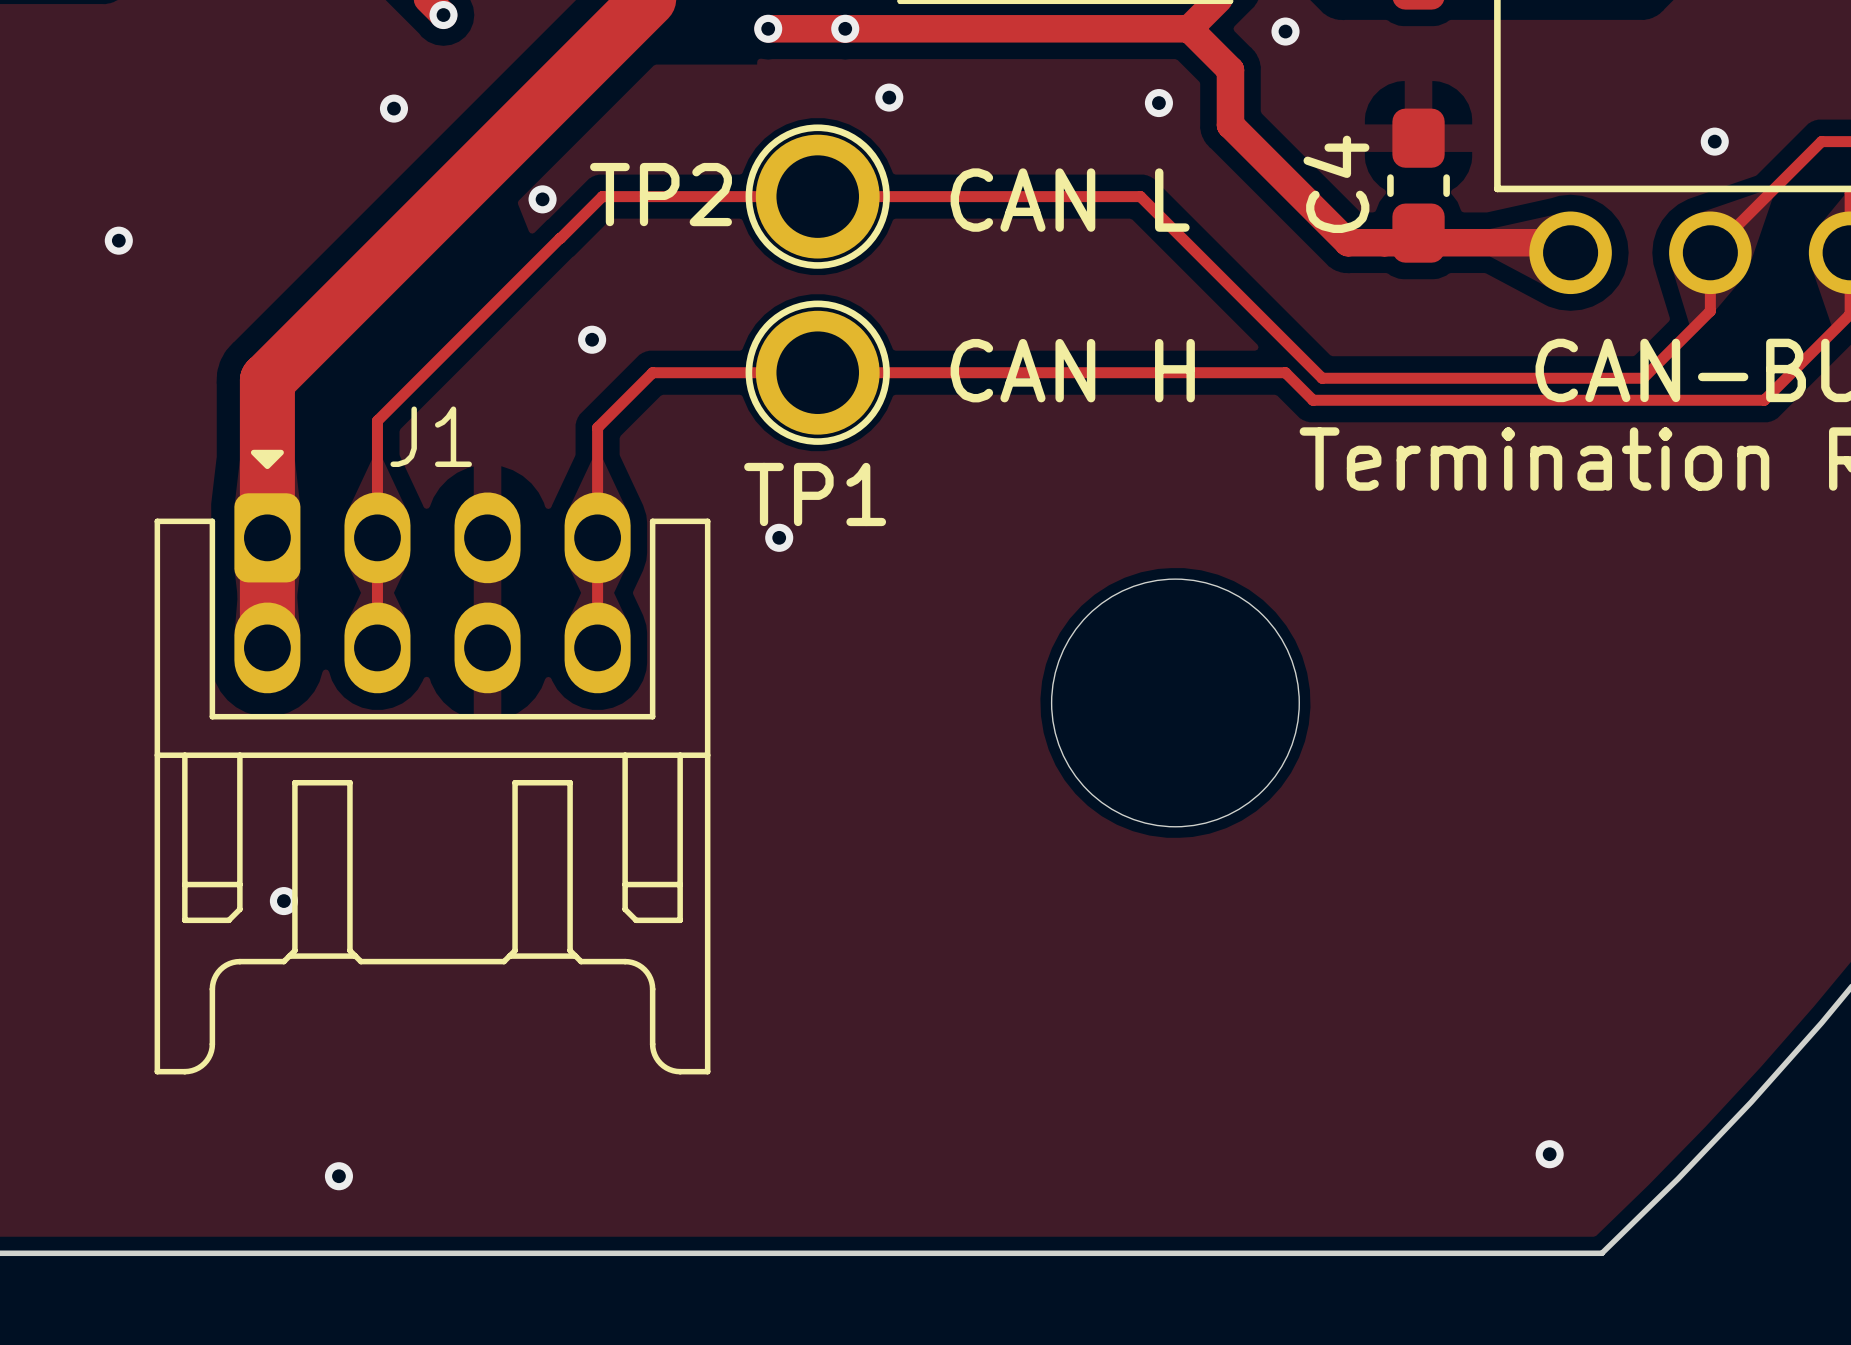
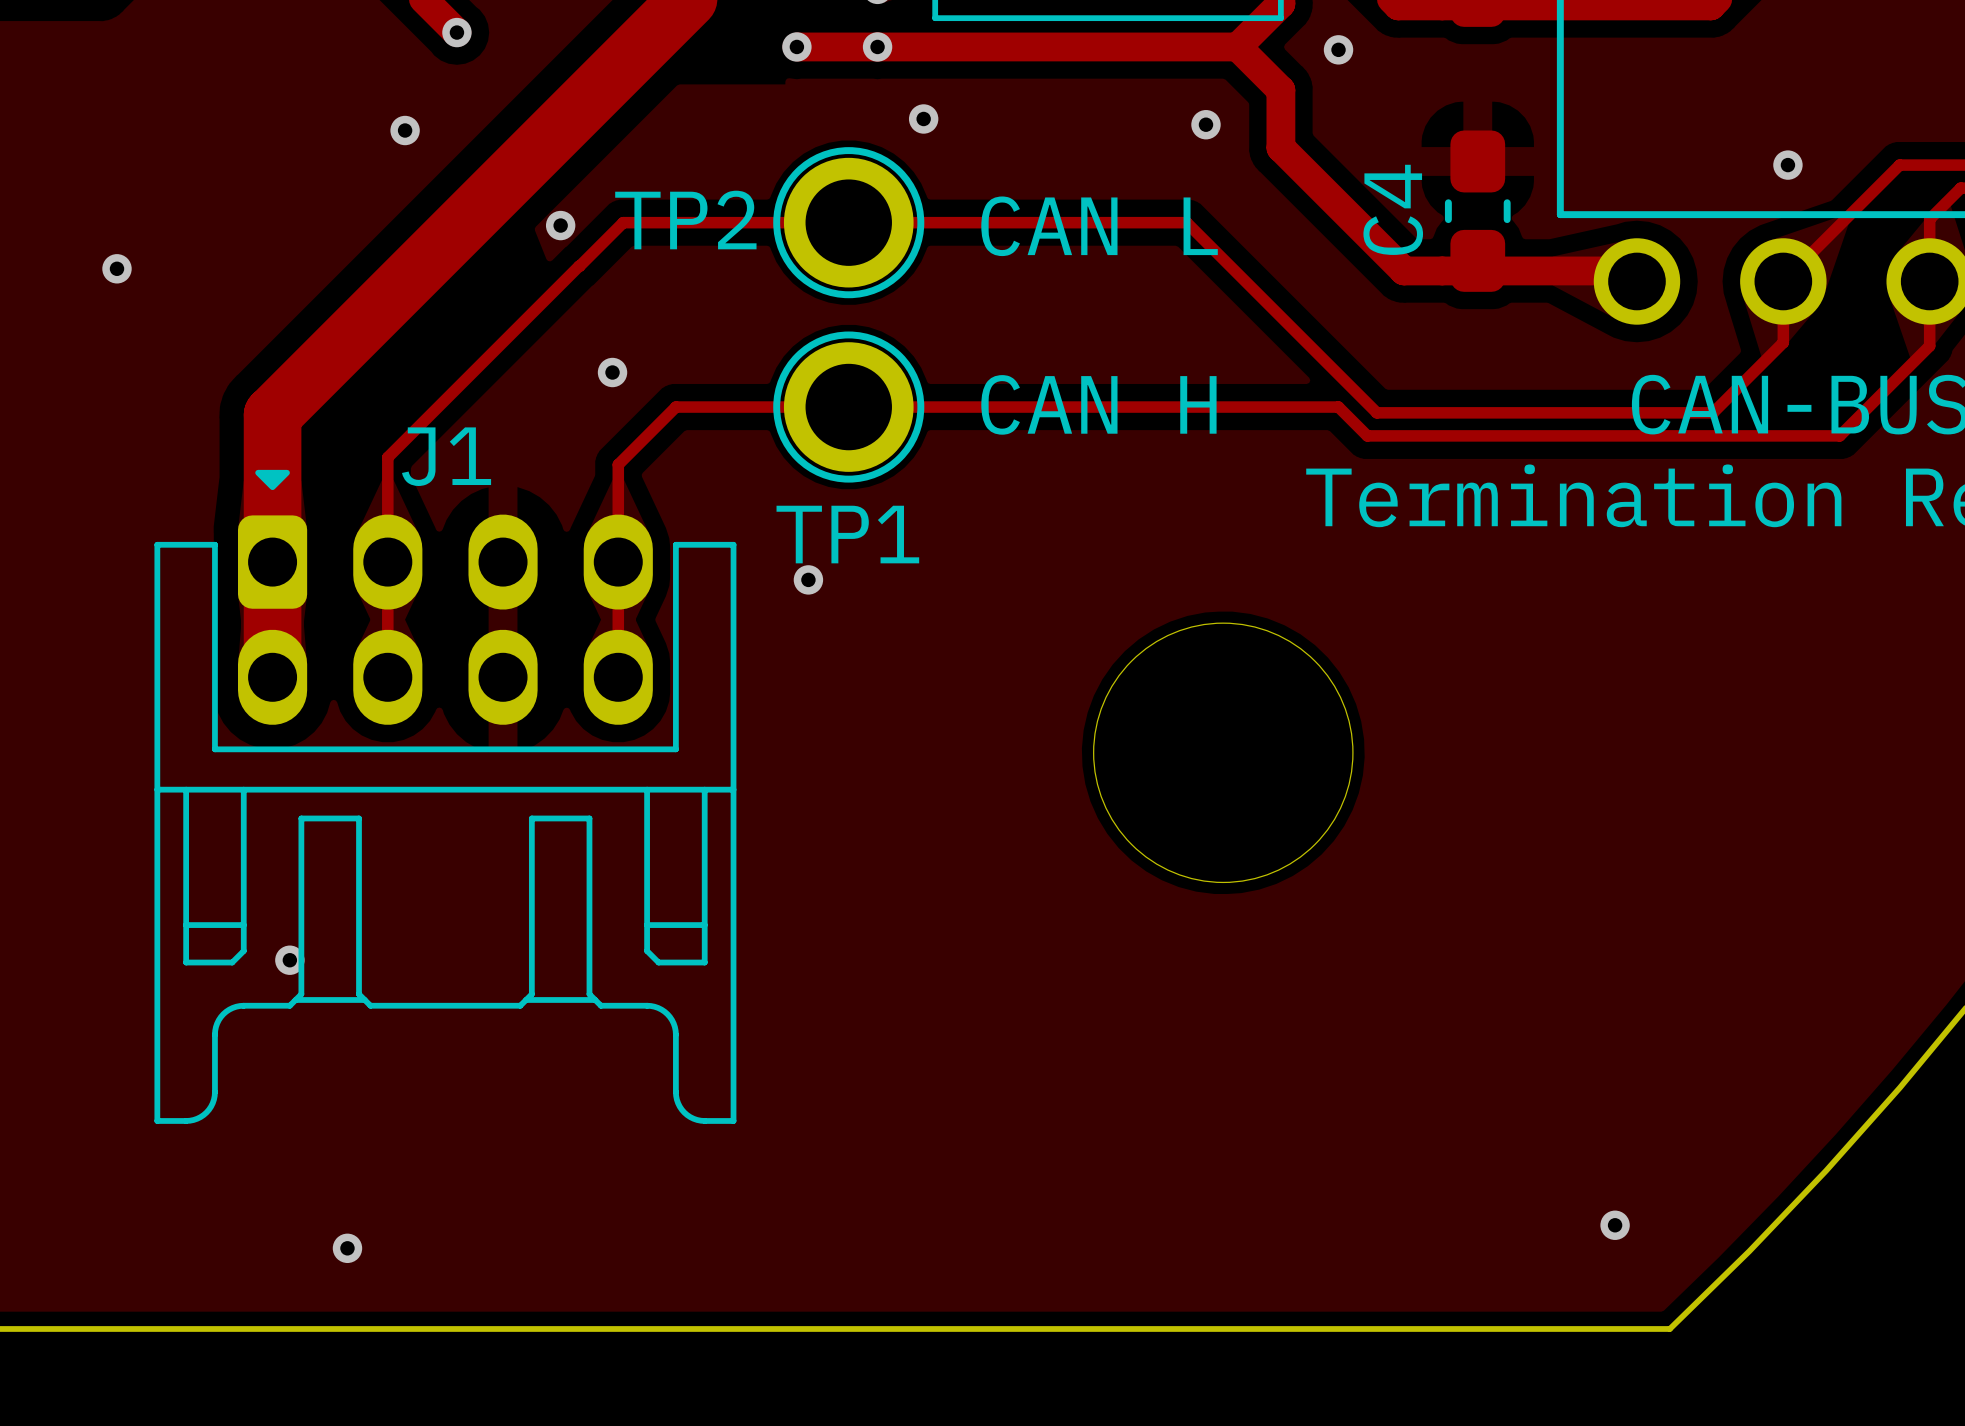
J1 position: (432, 762) -> (445, 796)

